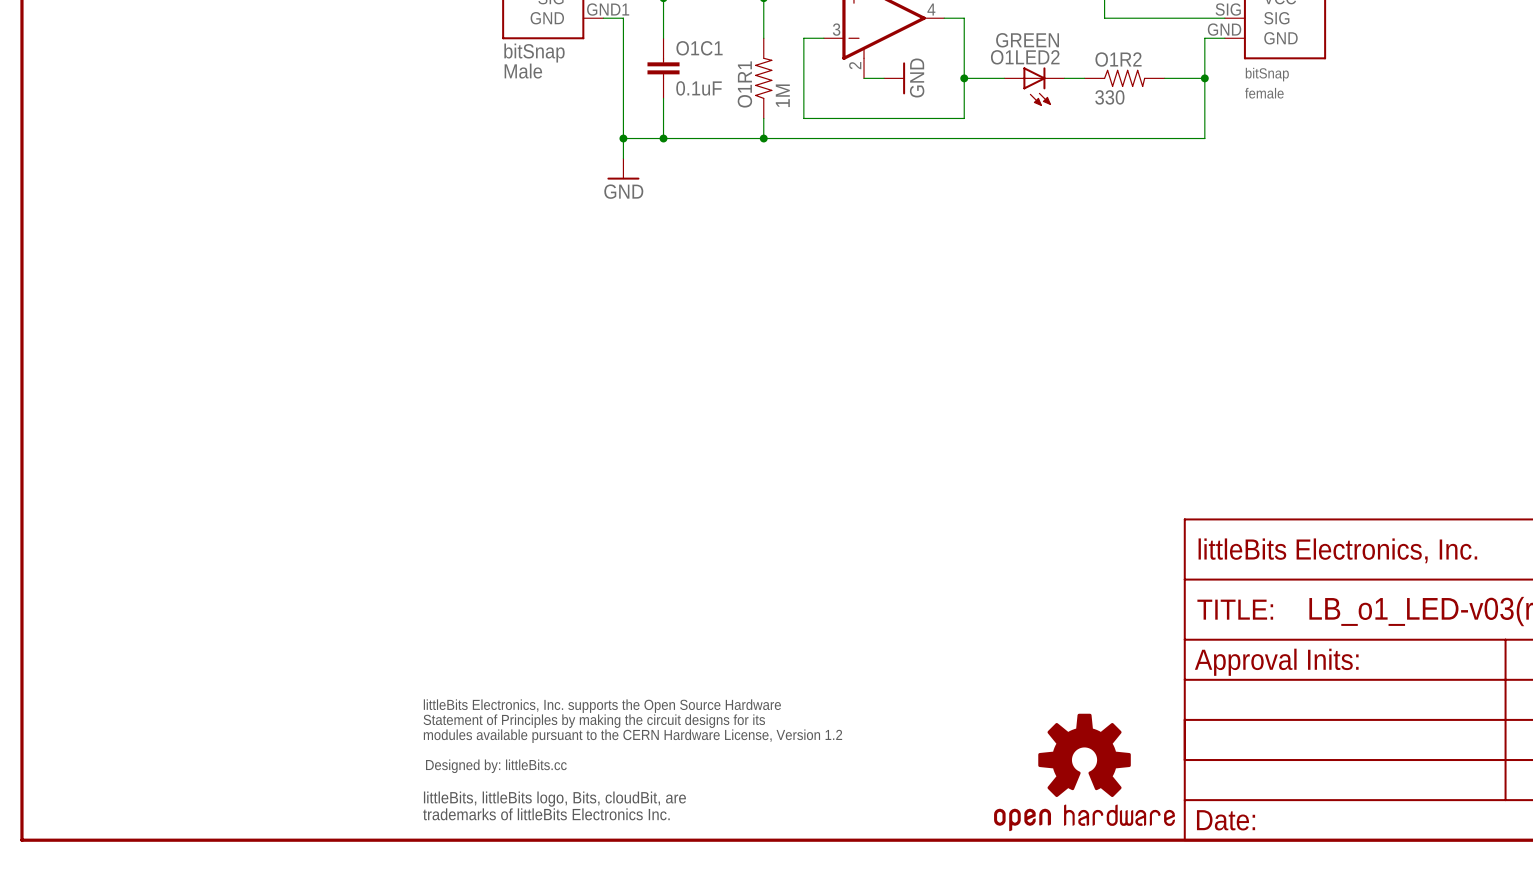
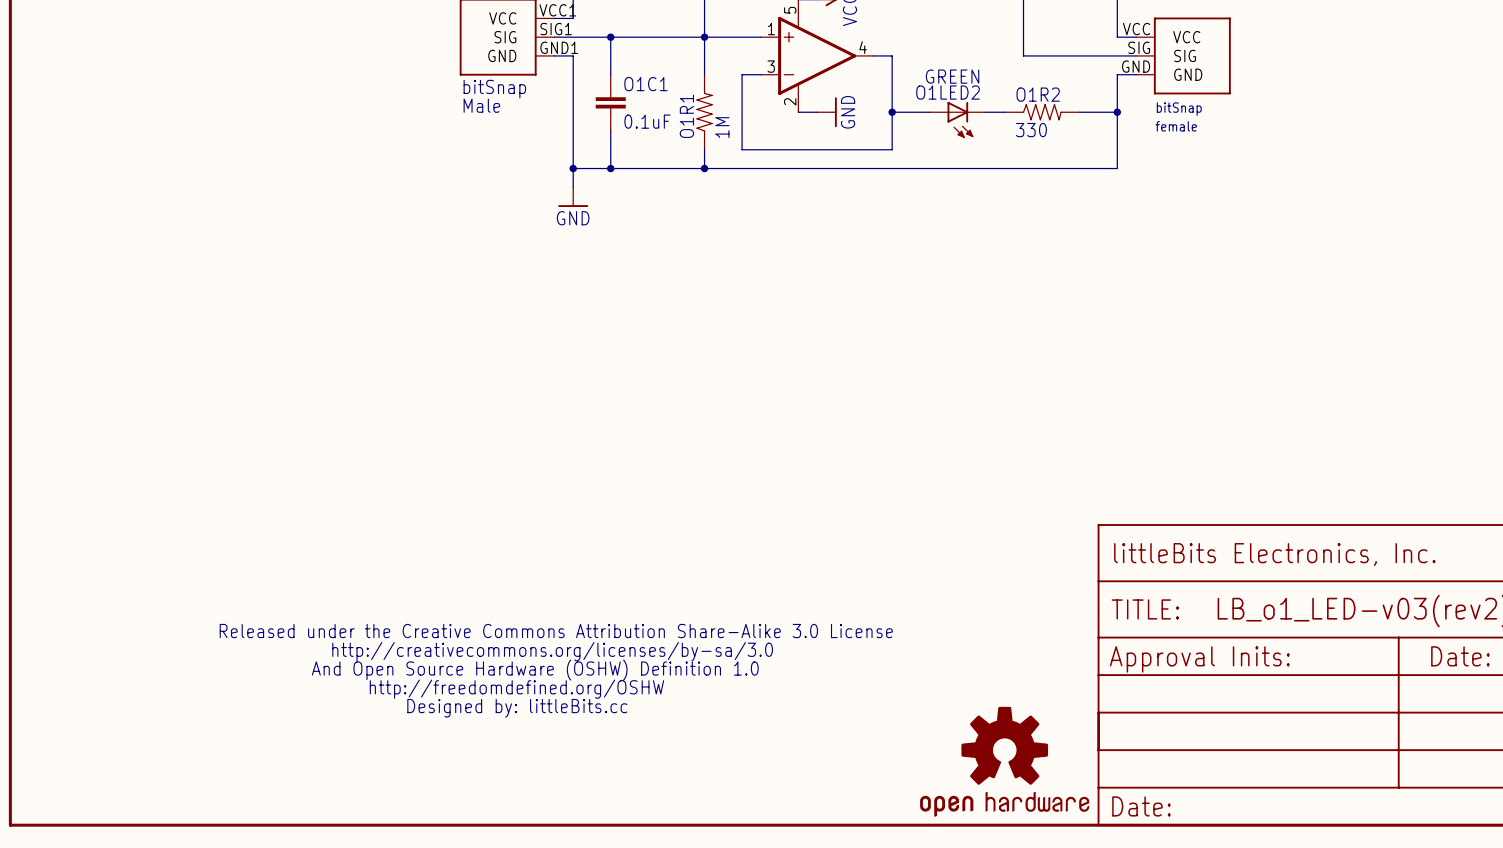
part: none -> (556, 670)
part: (632, 759) -> none

